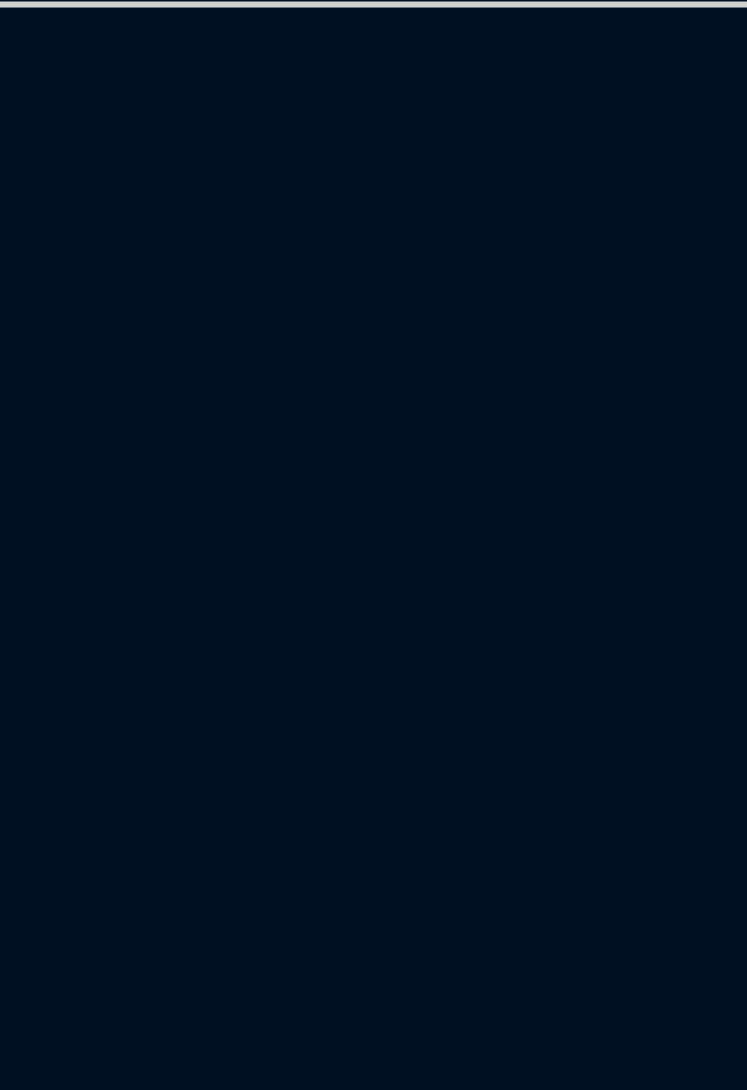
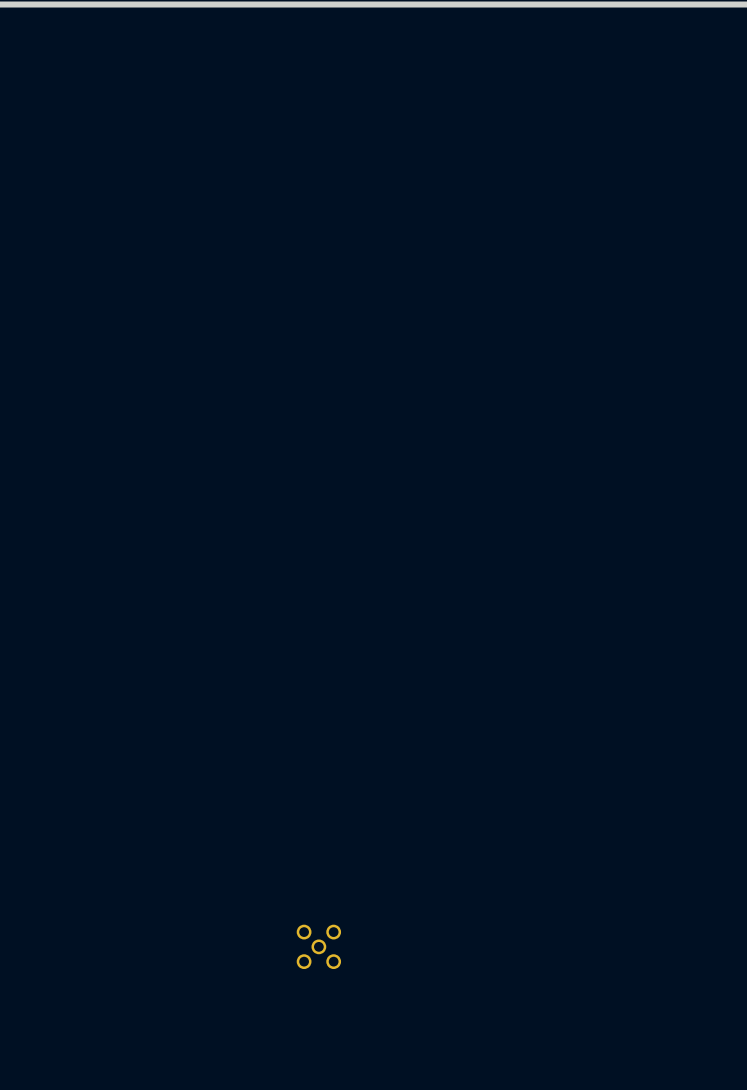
part: none -> (318, 946)

